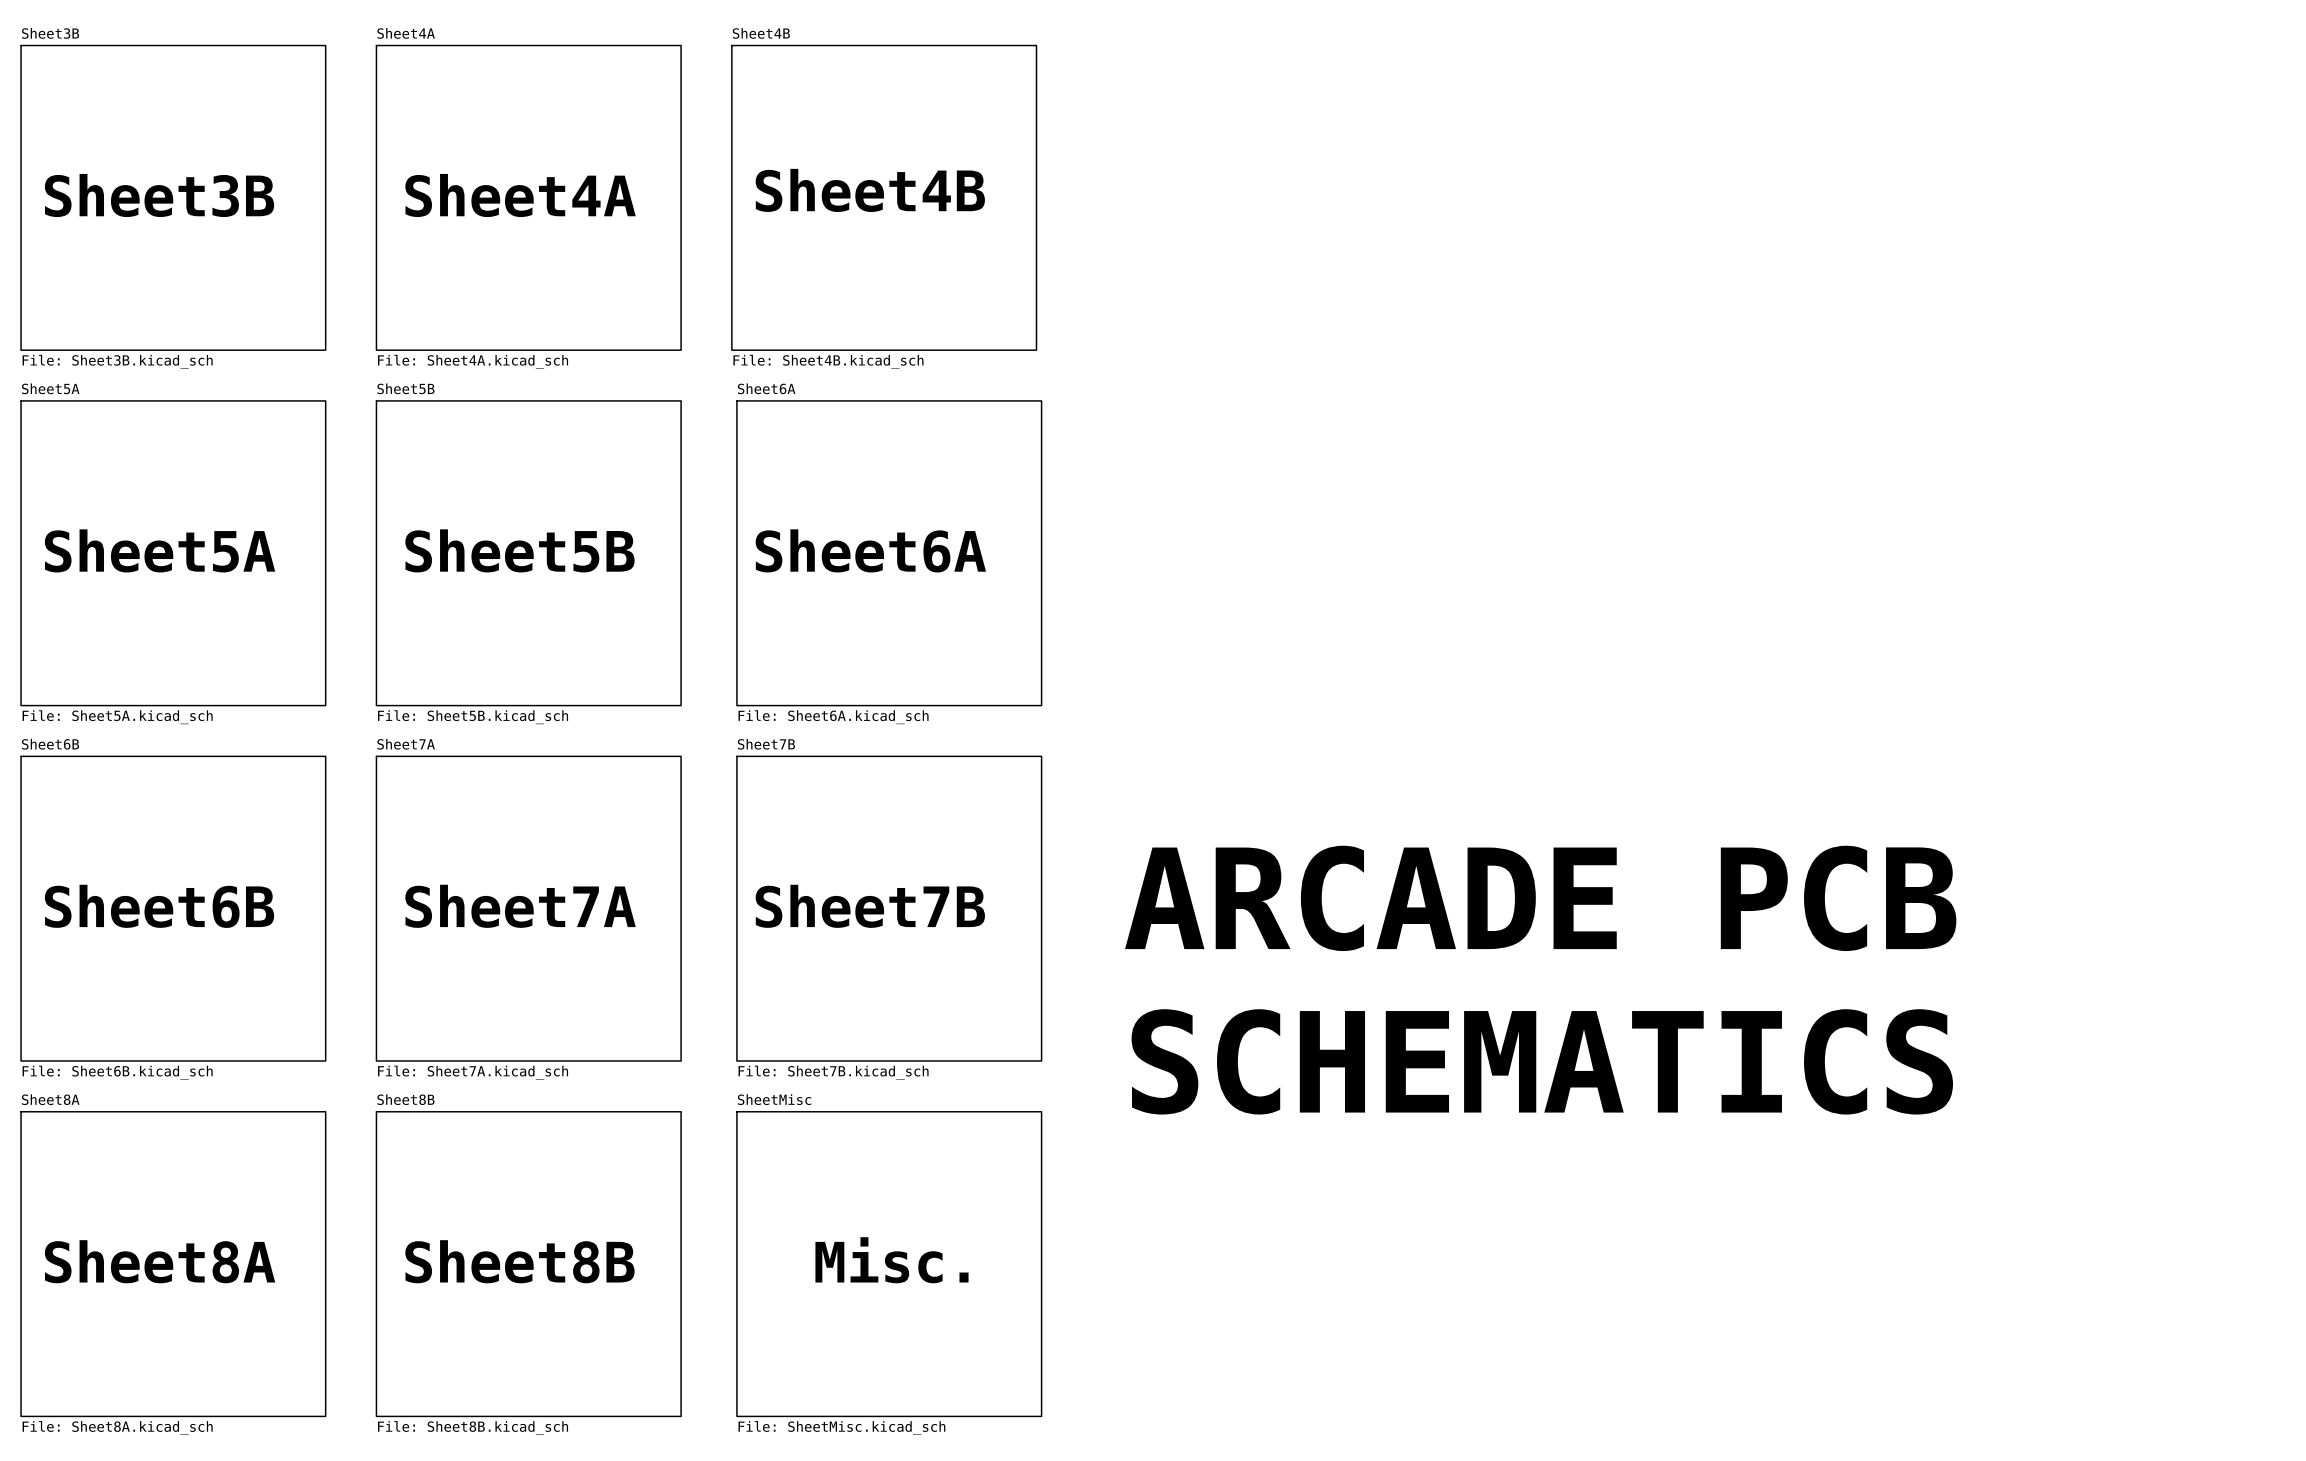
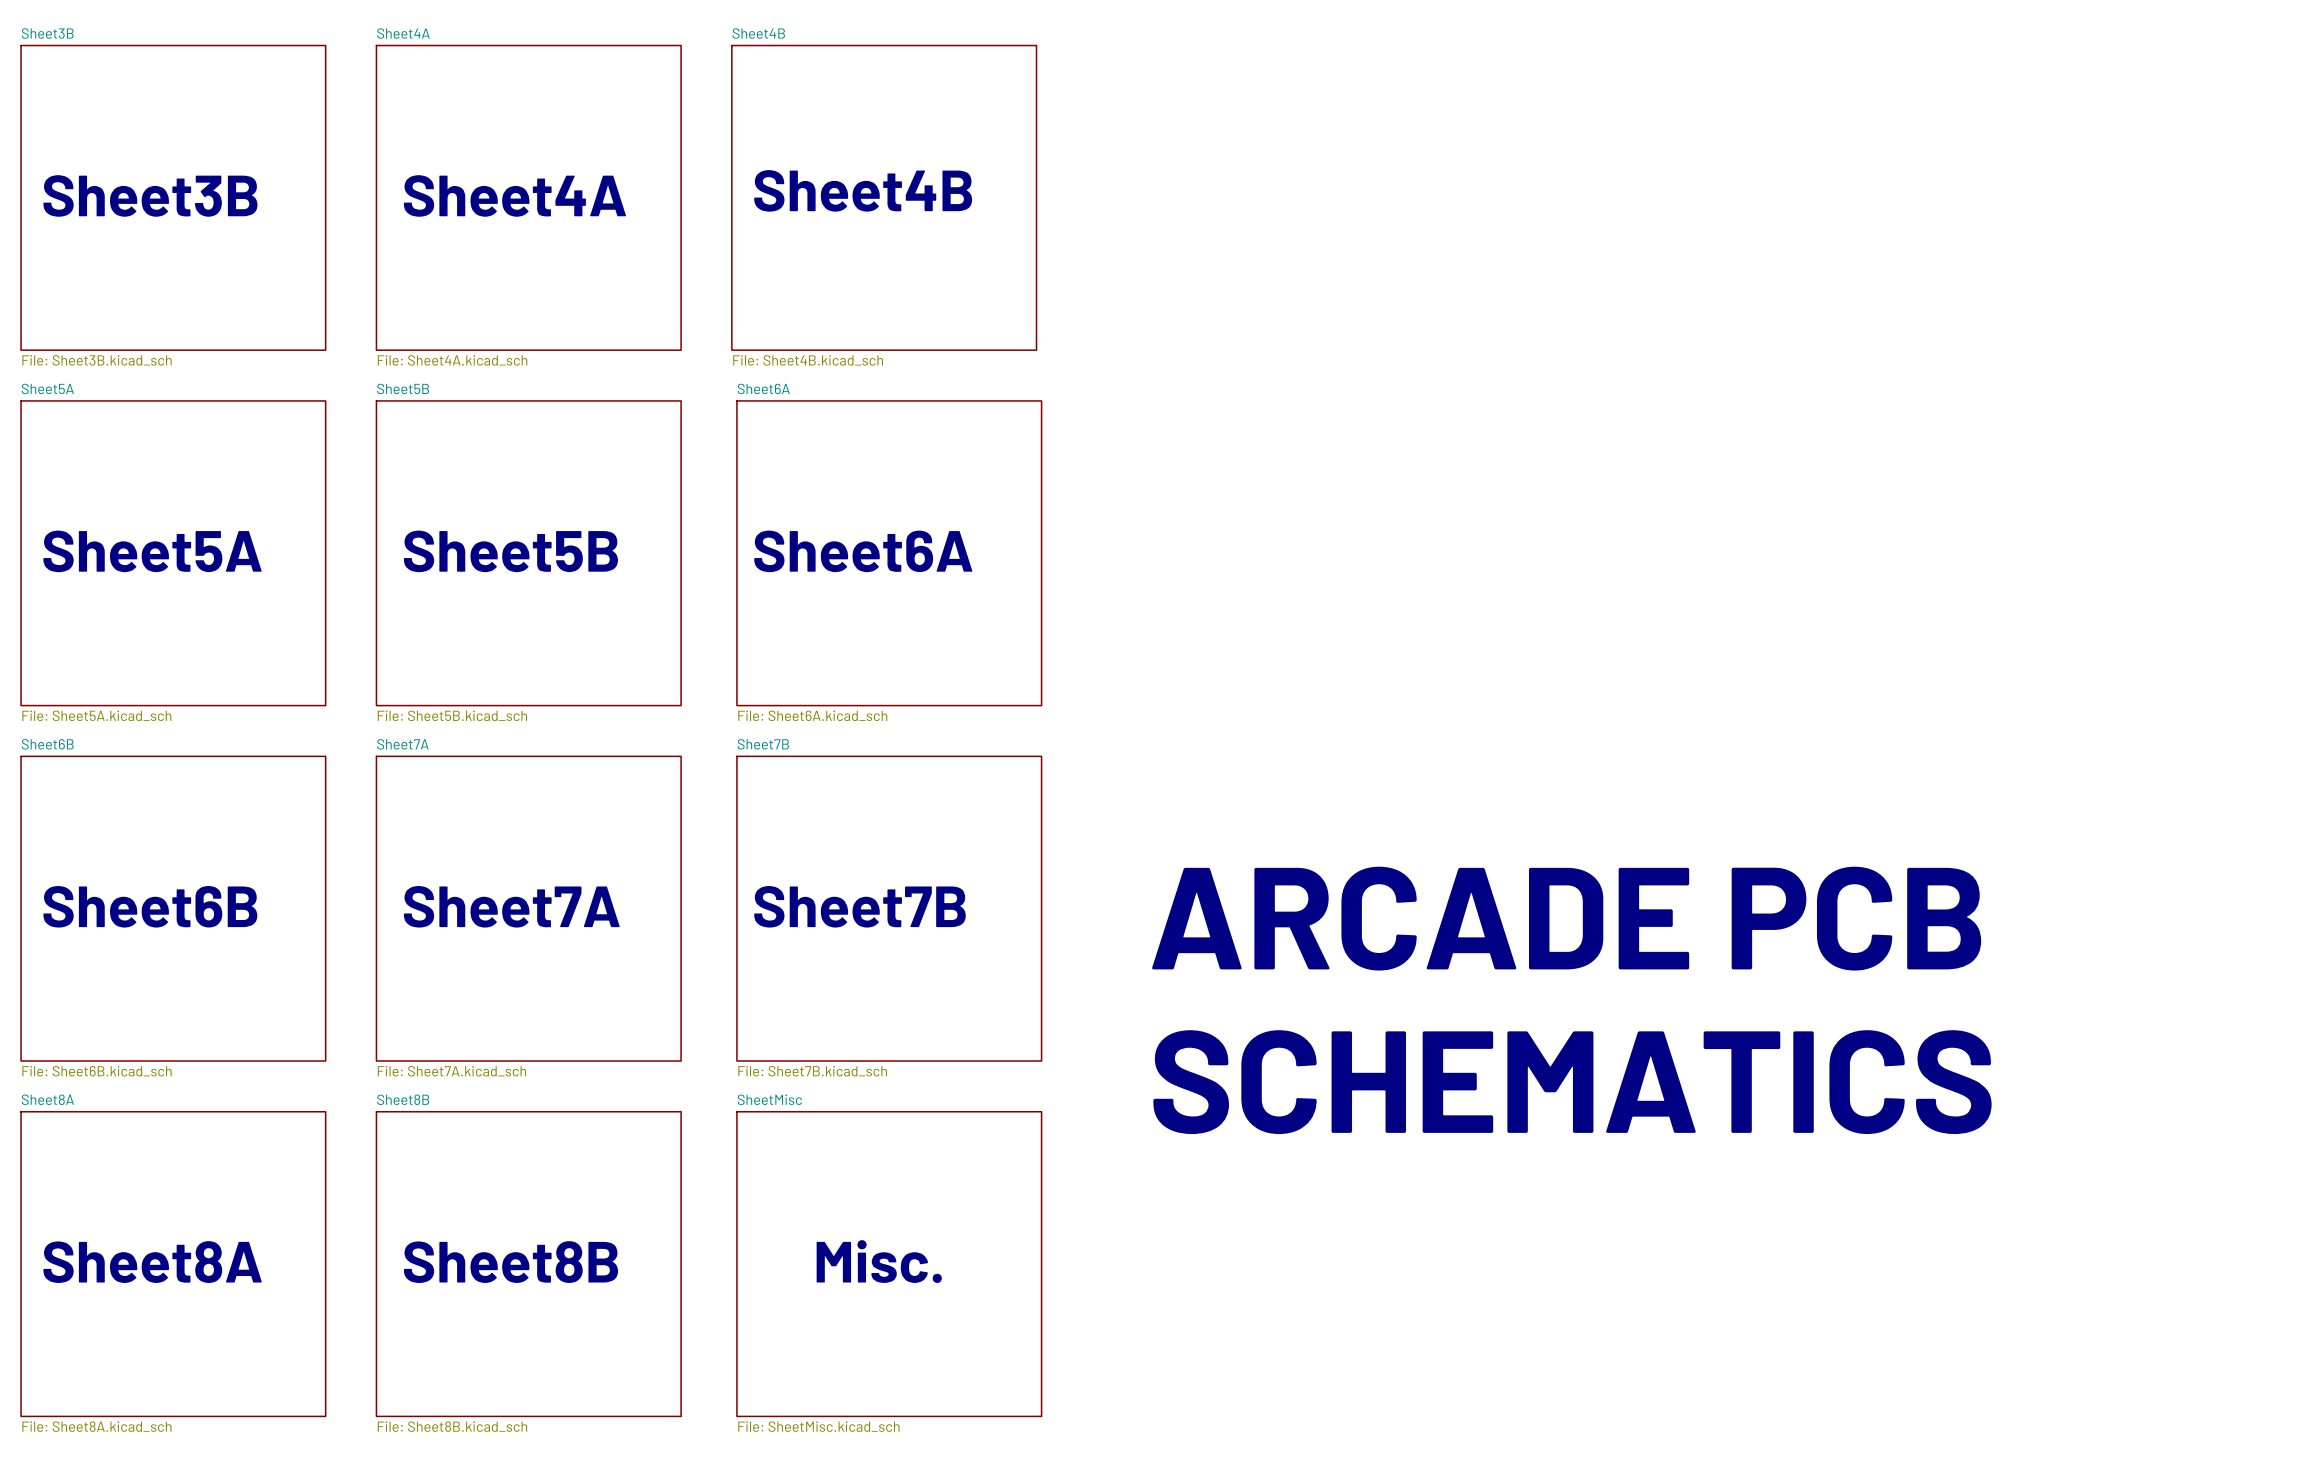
text position: ARCADE PCB (1540, 898) -> ARCADE PCB (1566, 918)
text position: SCHEMATICS (1542, 1061) -> SCHEMATICS (1572, 1082)

